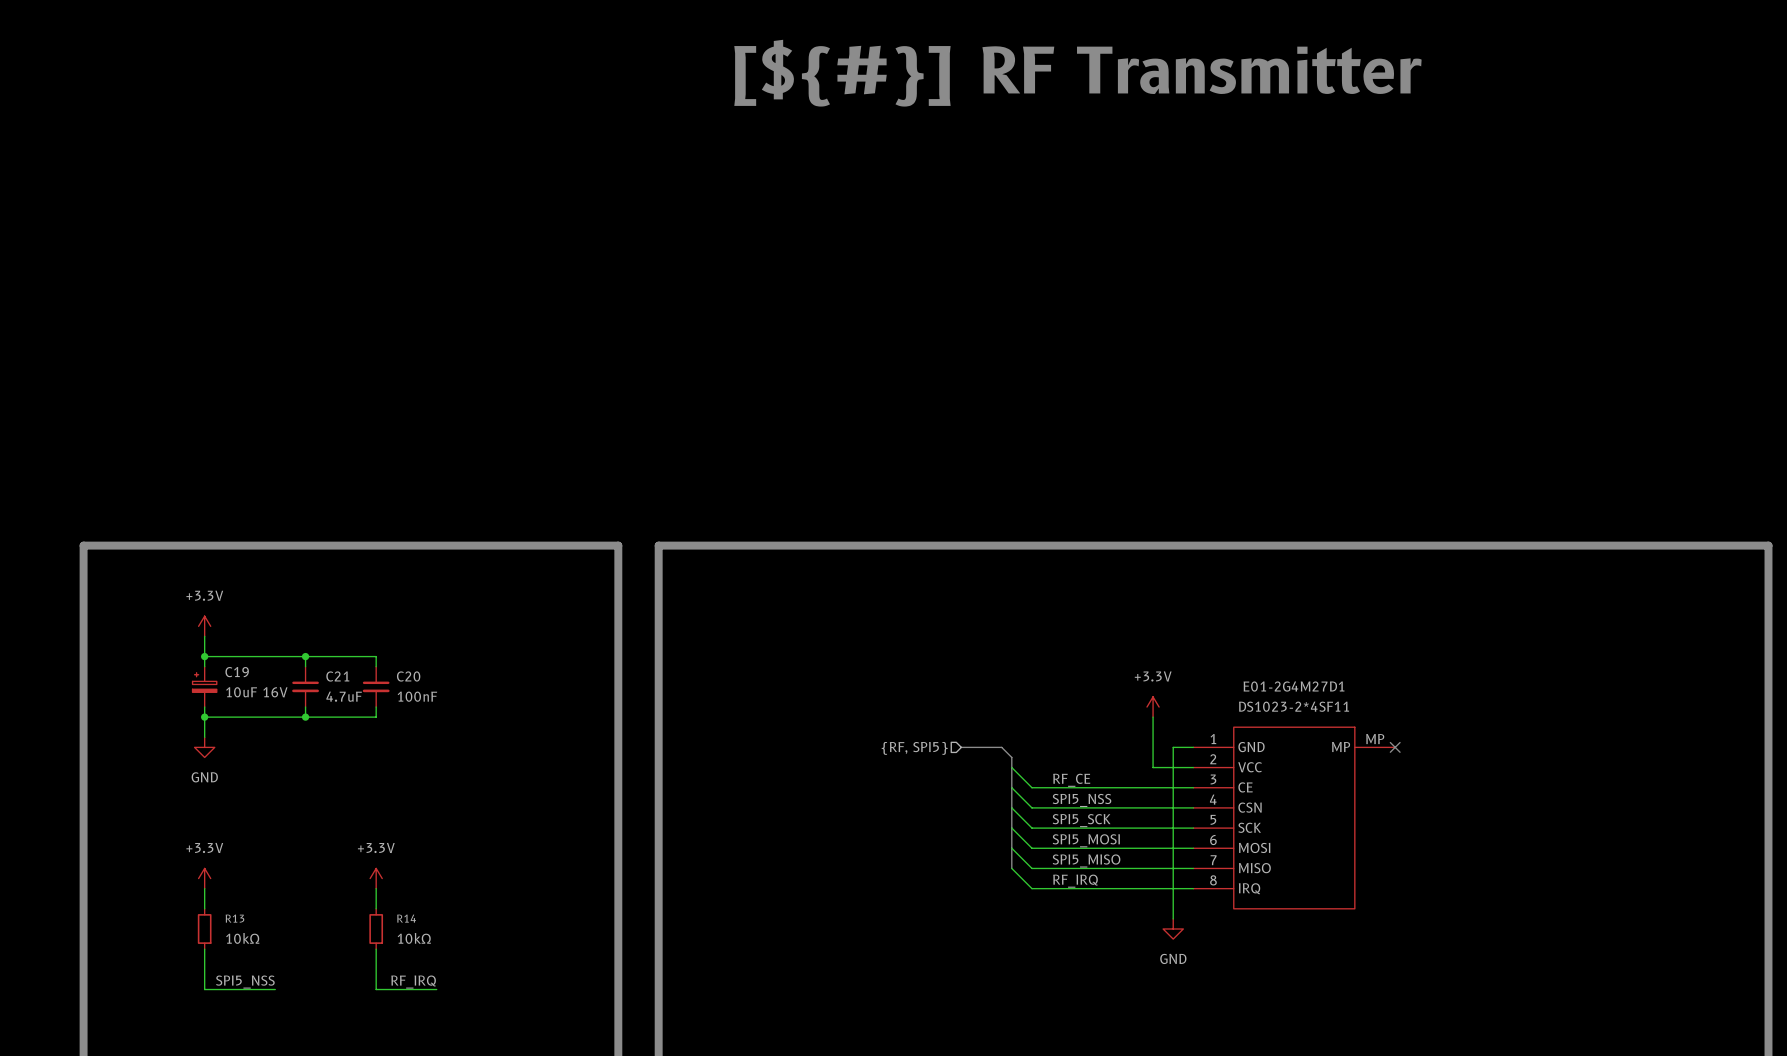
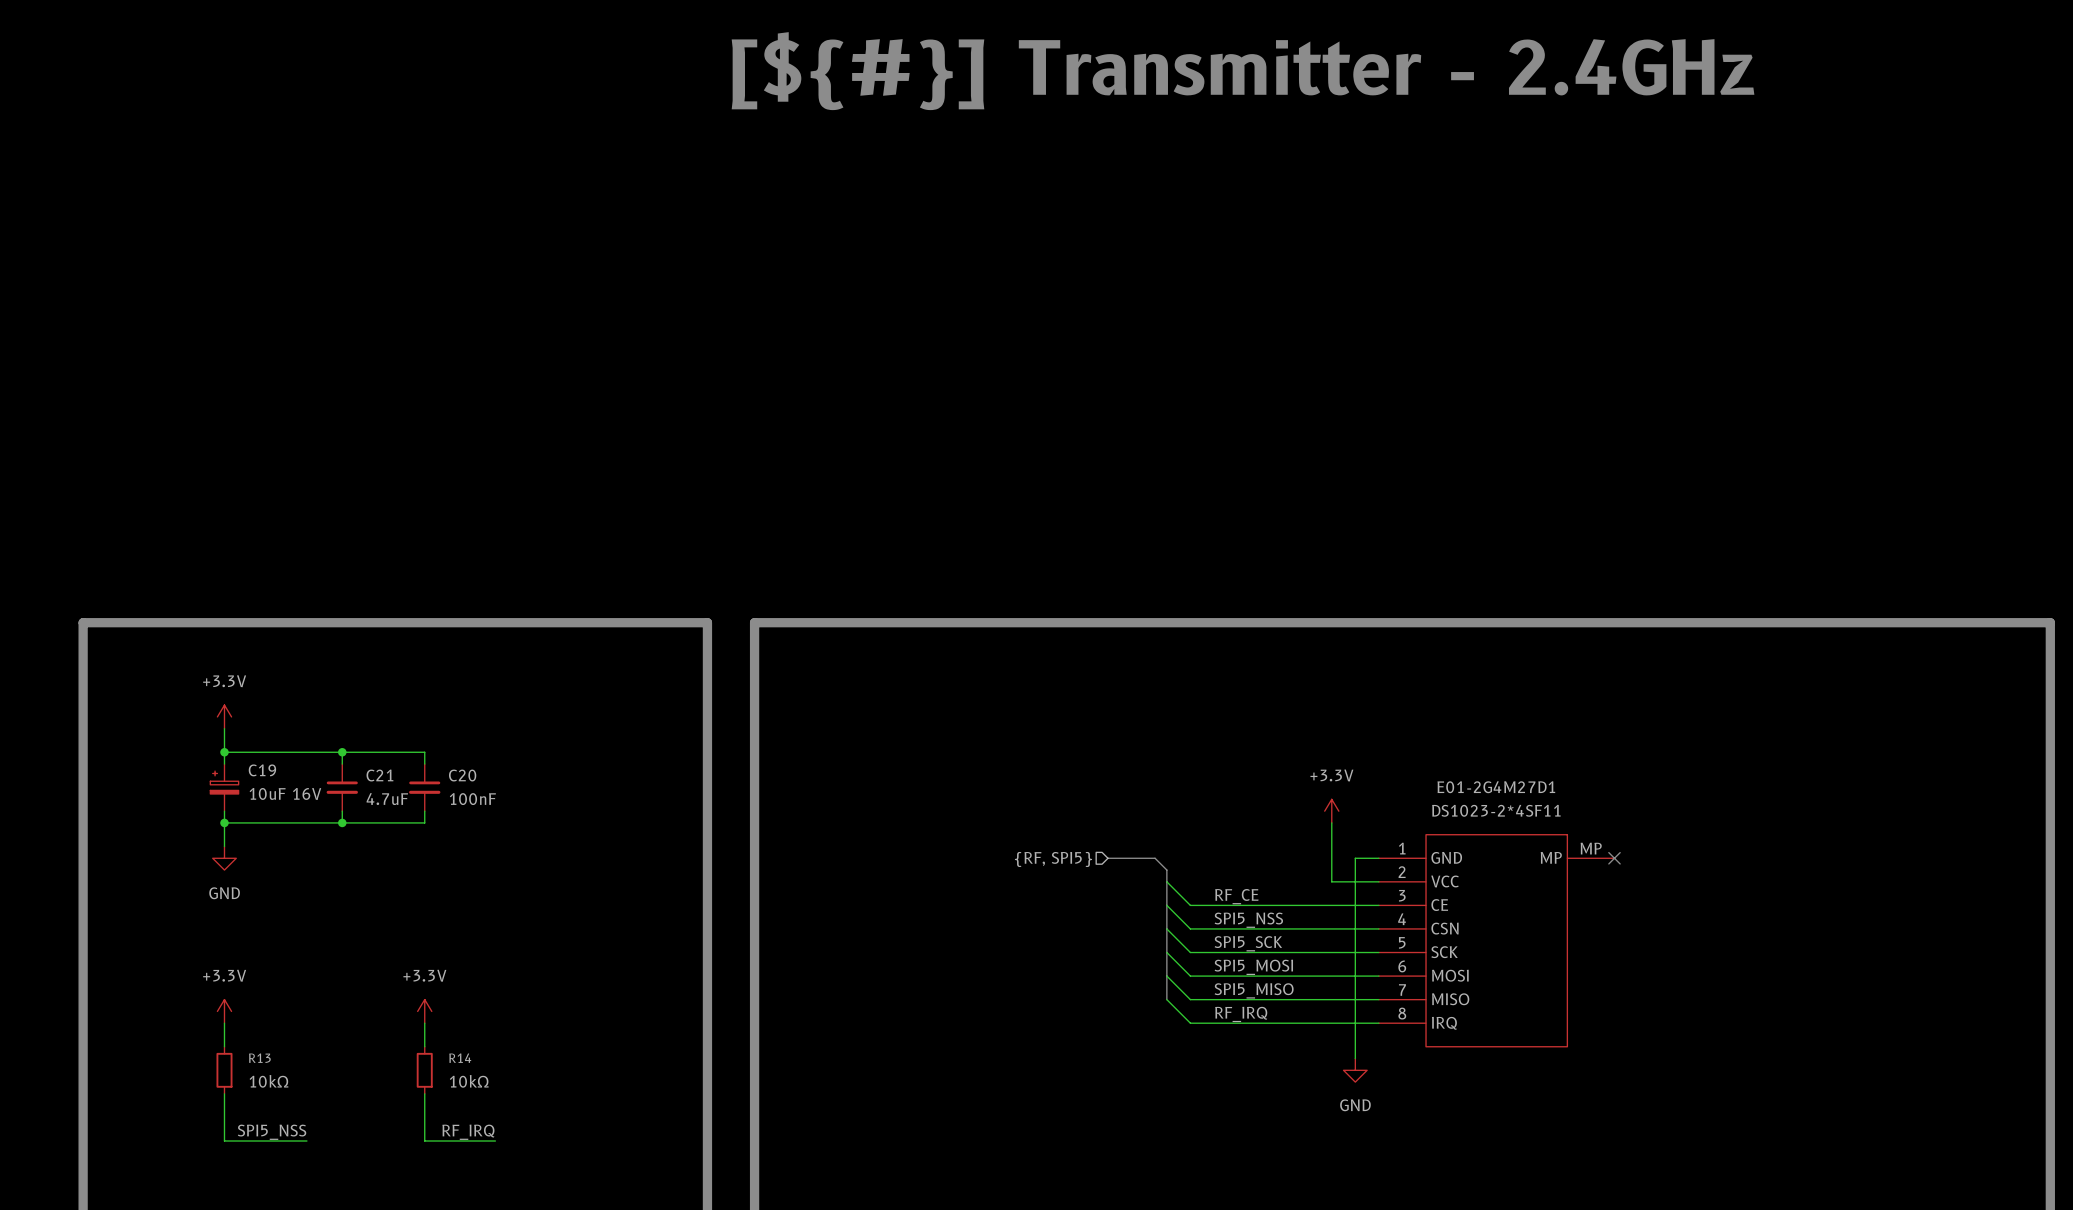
text: [${#}] RF Transmitter (1077, 73) -> [${#}] Transmitter - 2.4GHz (1243, 71)

